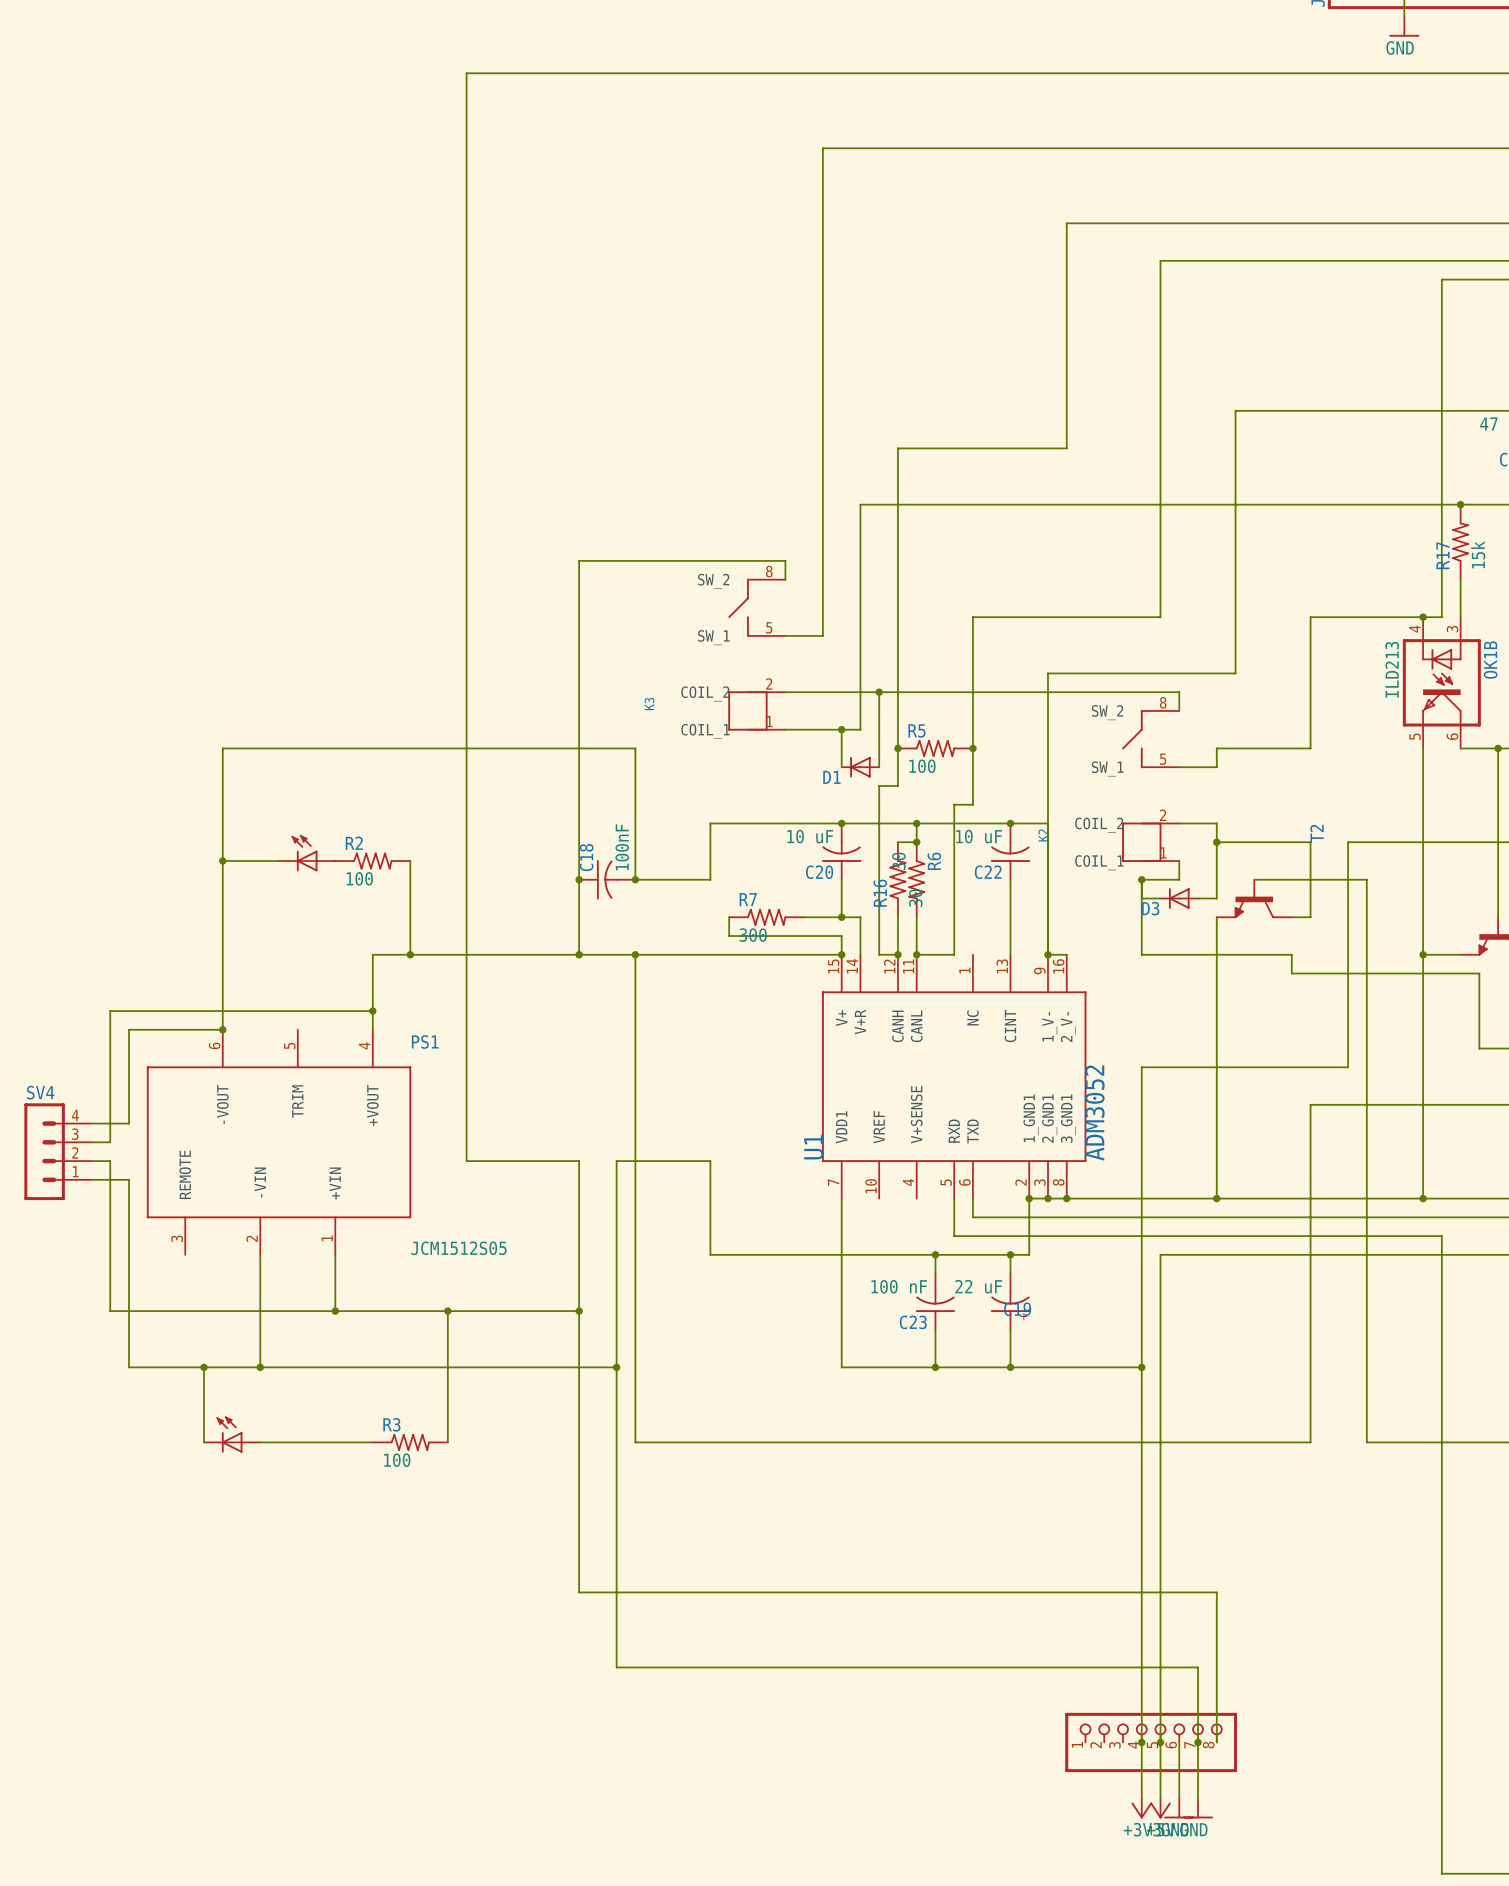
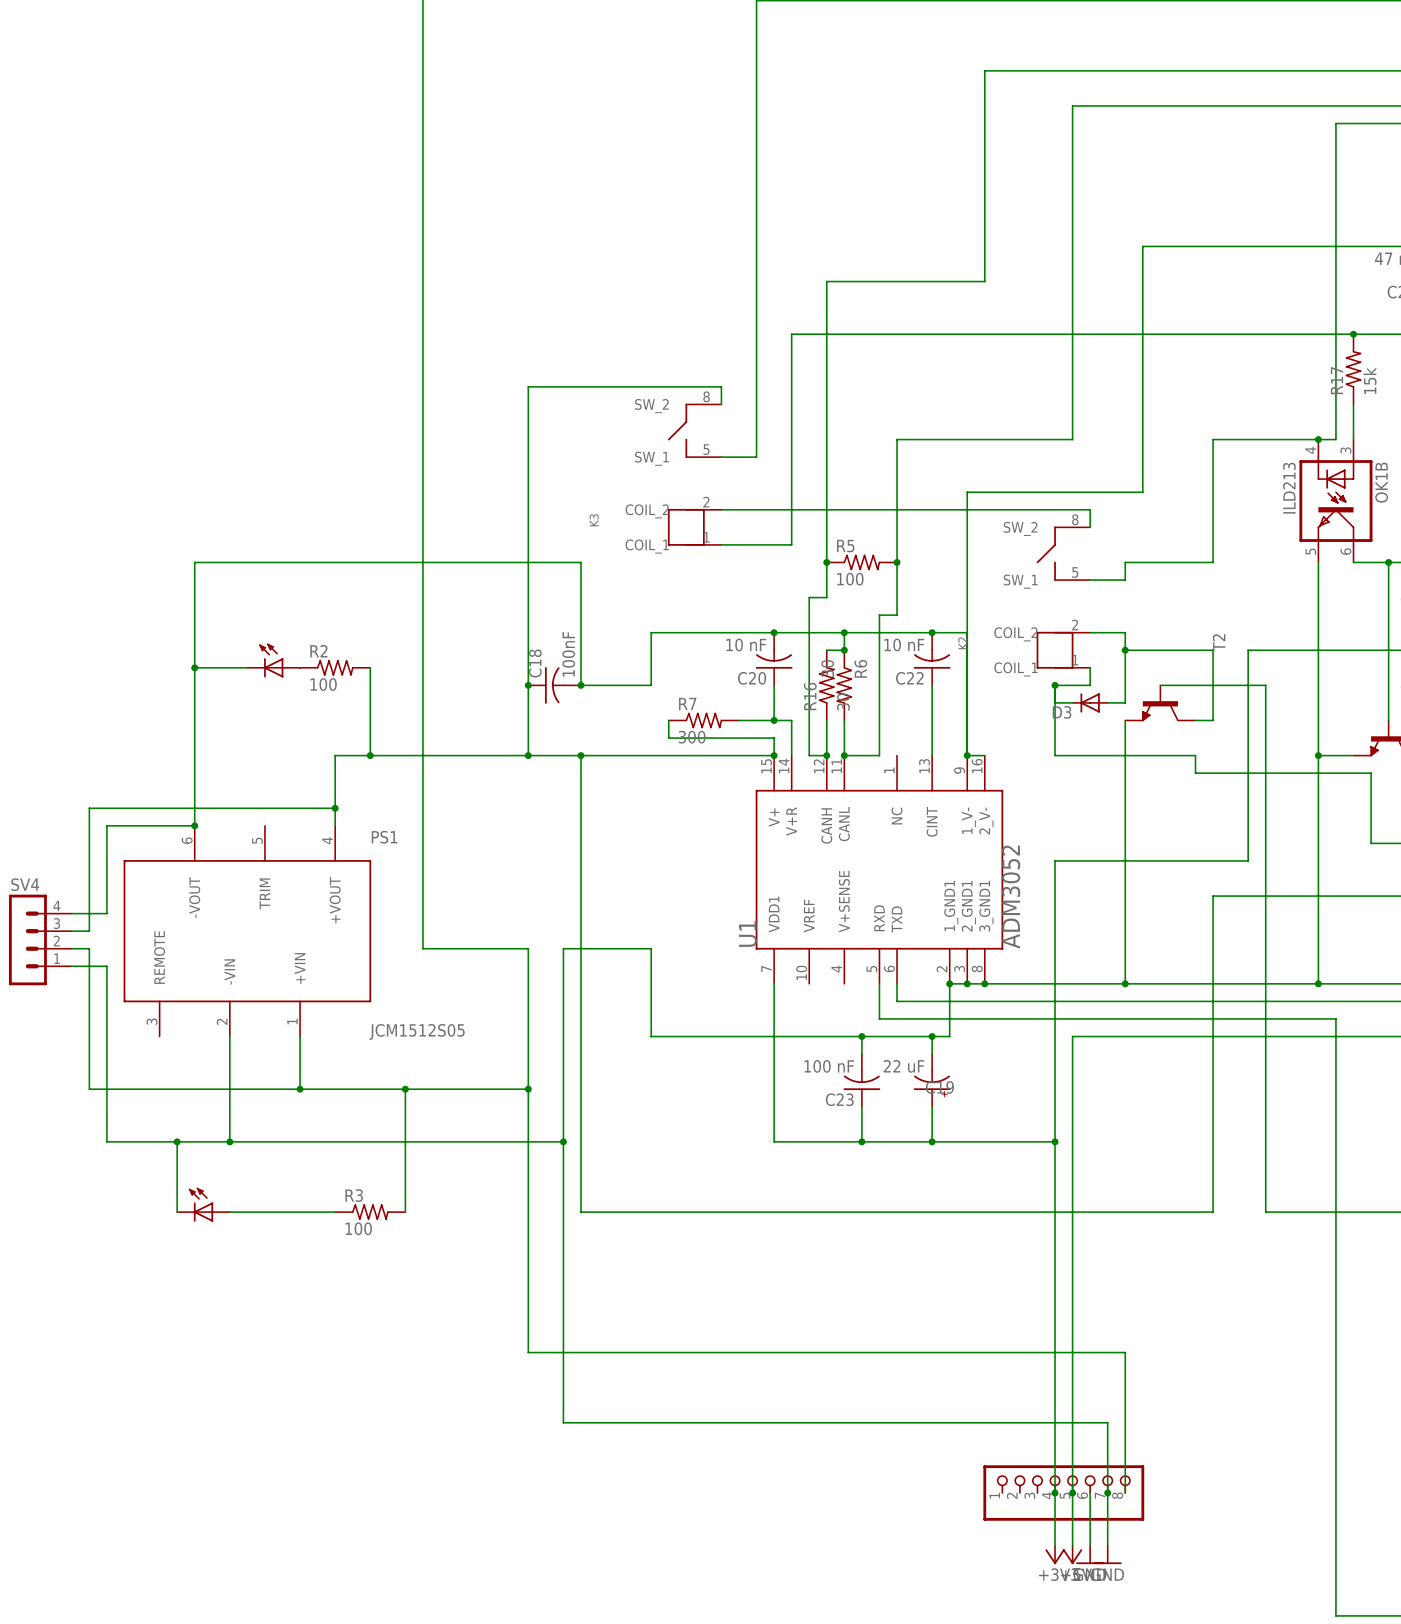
wire: (879, 692) (879, 767) -> none
junction: (879, 692) -> none
wire: (841, 729) (841, 767) -> none
junction: (841, 729) -> none
D1: (860, 767) -> none
C20 value: 10 uF (810, 836) -> 10 nF (746, 644)
C22 value: 10 uF (979, 836) -> 10 nF (904, 644)

